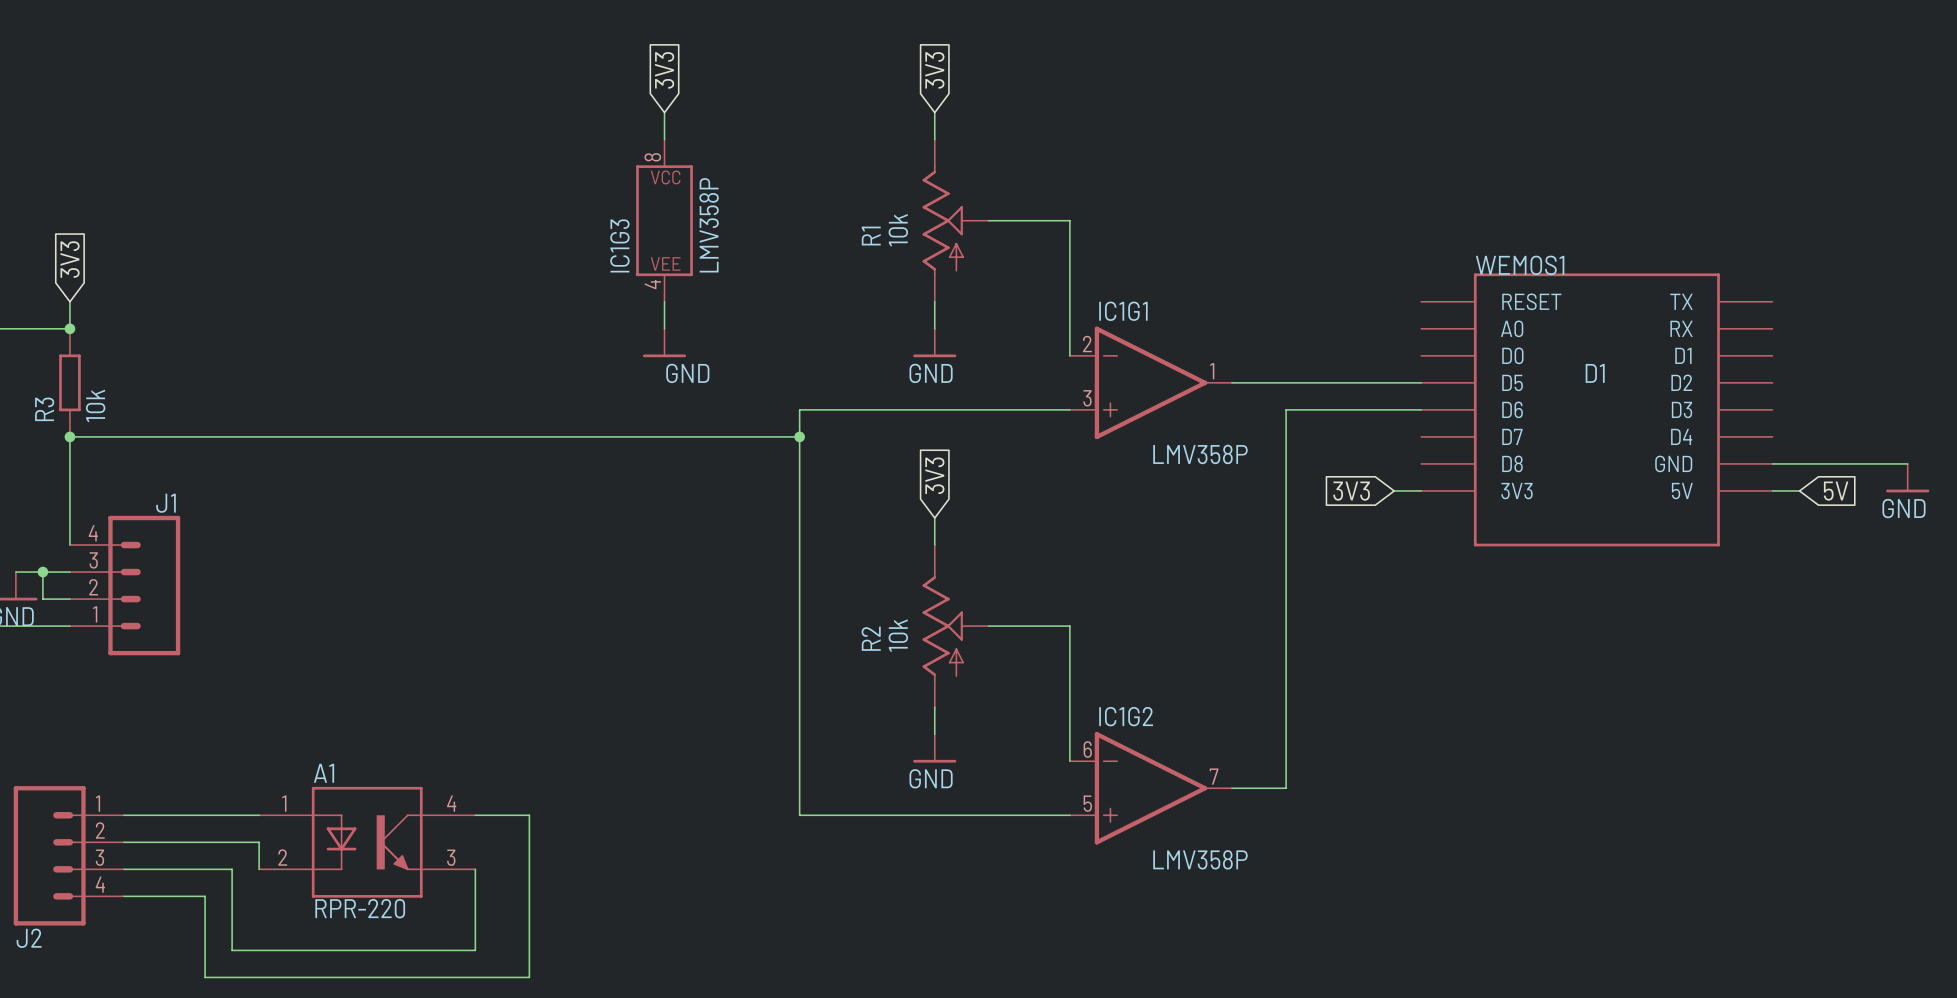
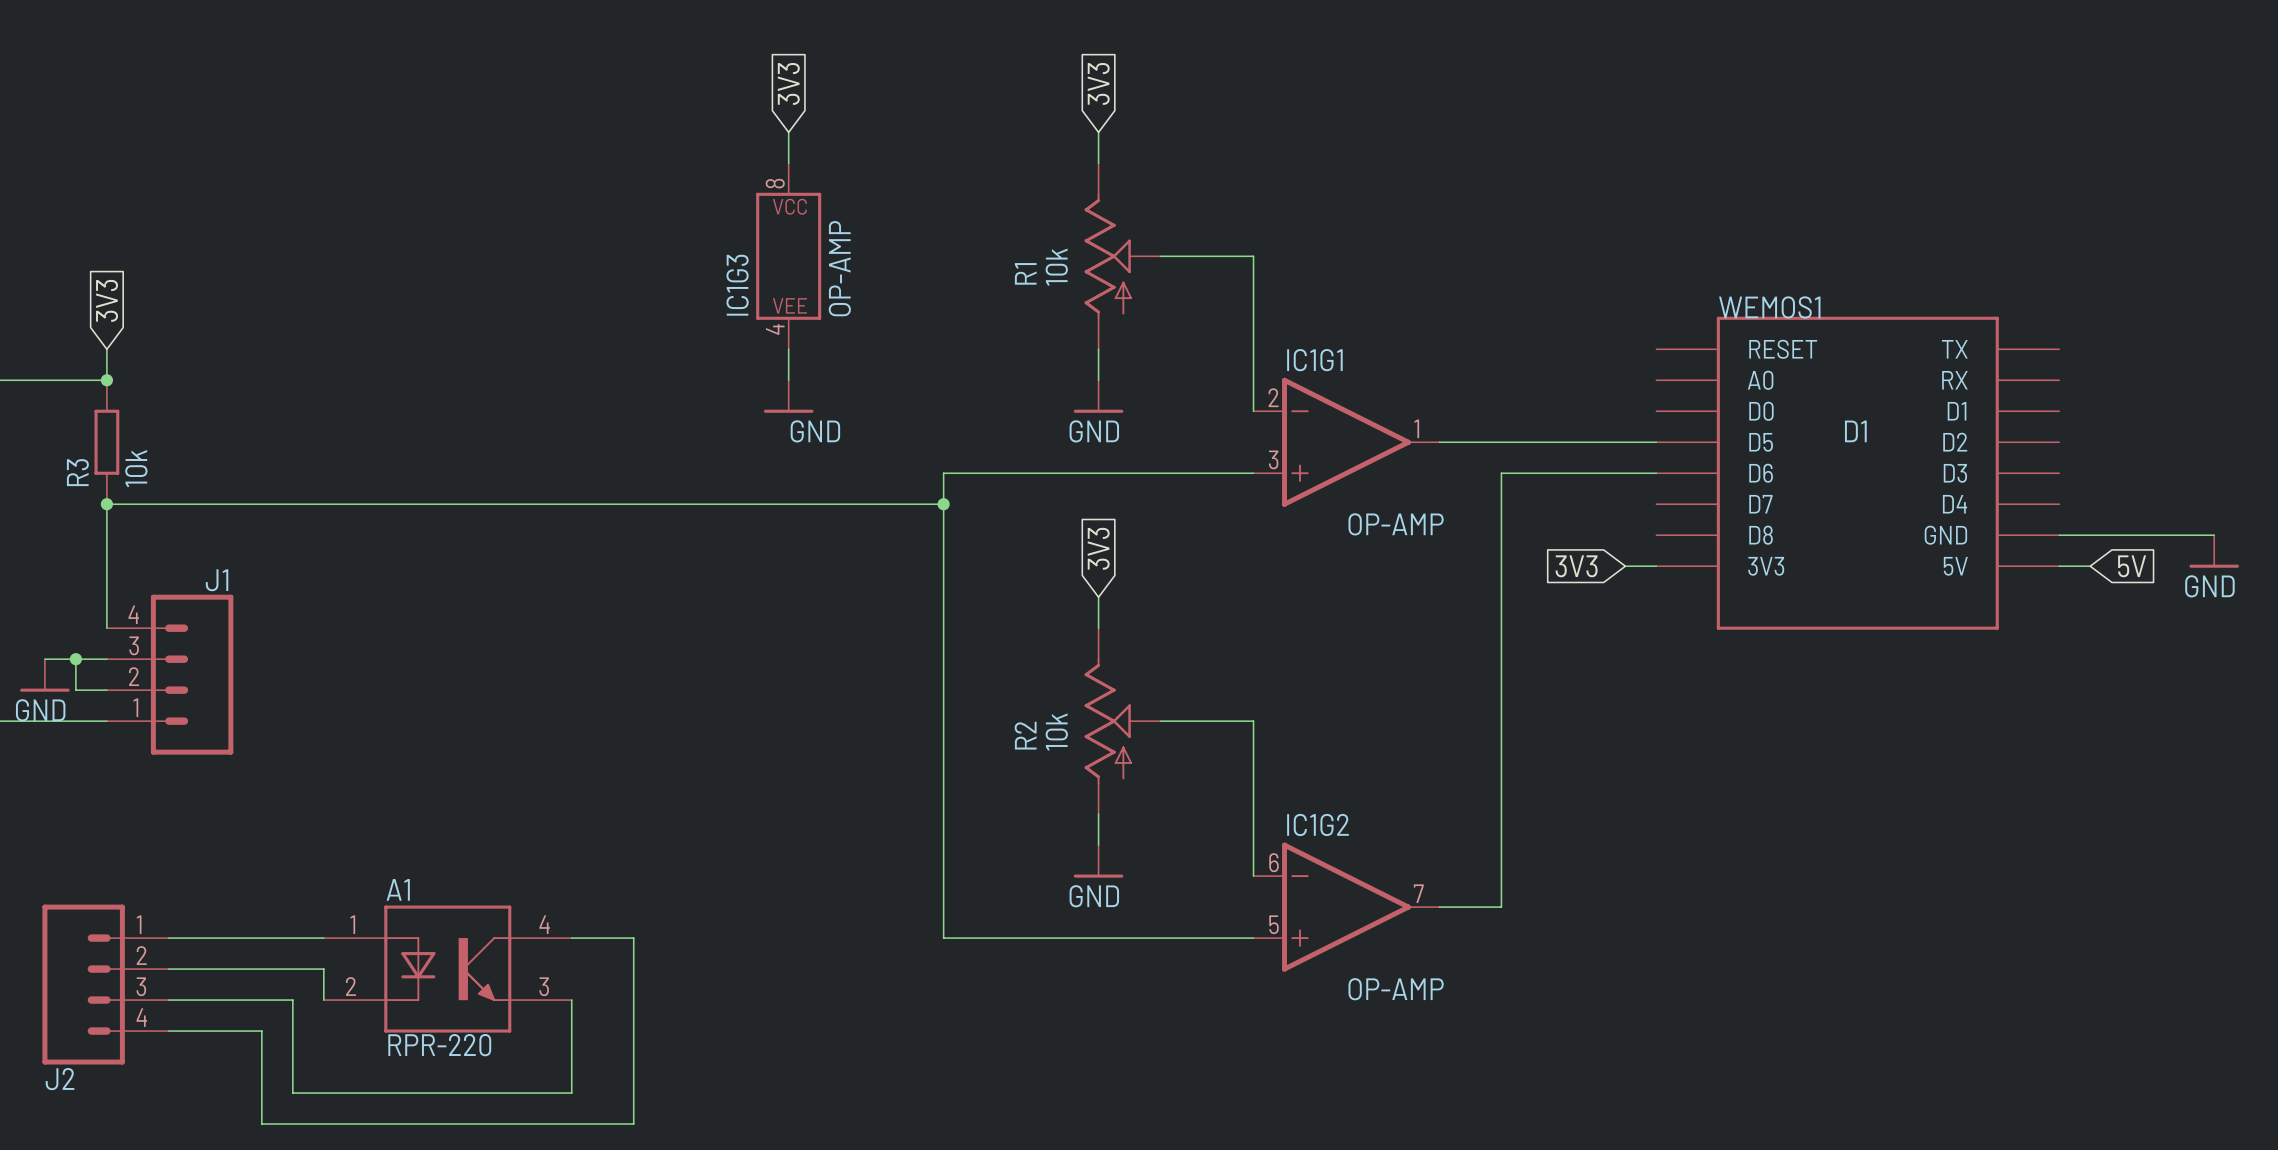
IC1G3 value: LMV358P (709, 225) -> OP-AMP (839, 268)
IC1G1 value: LMV358P (1200, 454) -> OP-AMP (1396, 524)
IC1G2 value: LMV358P (1200, 859) -> OP-AMP (1396, 989)

